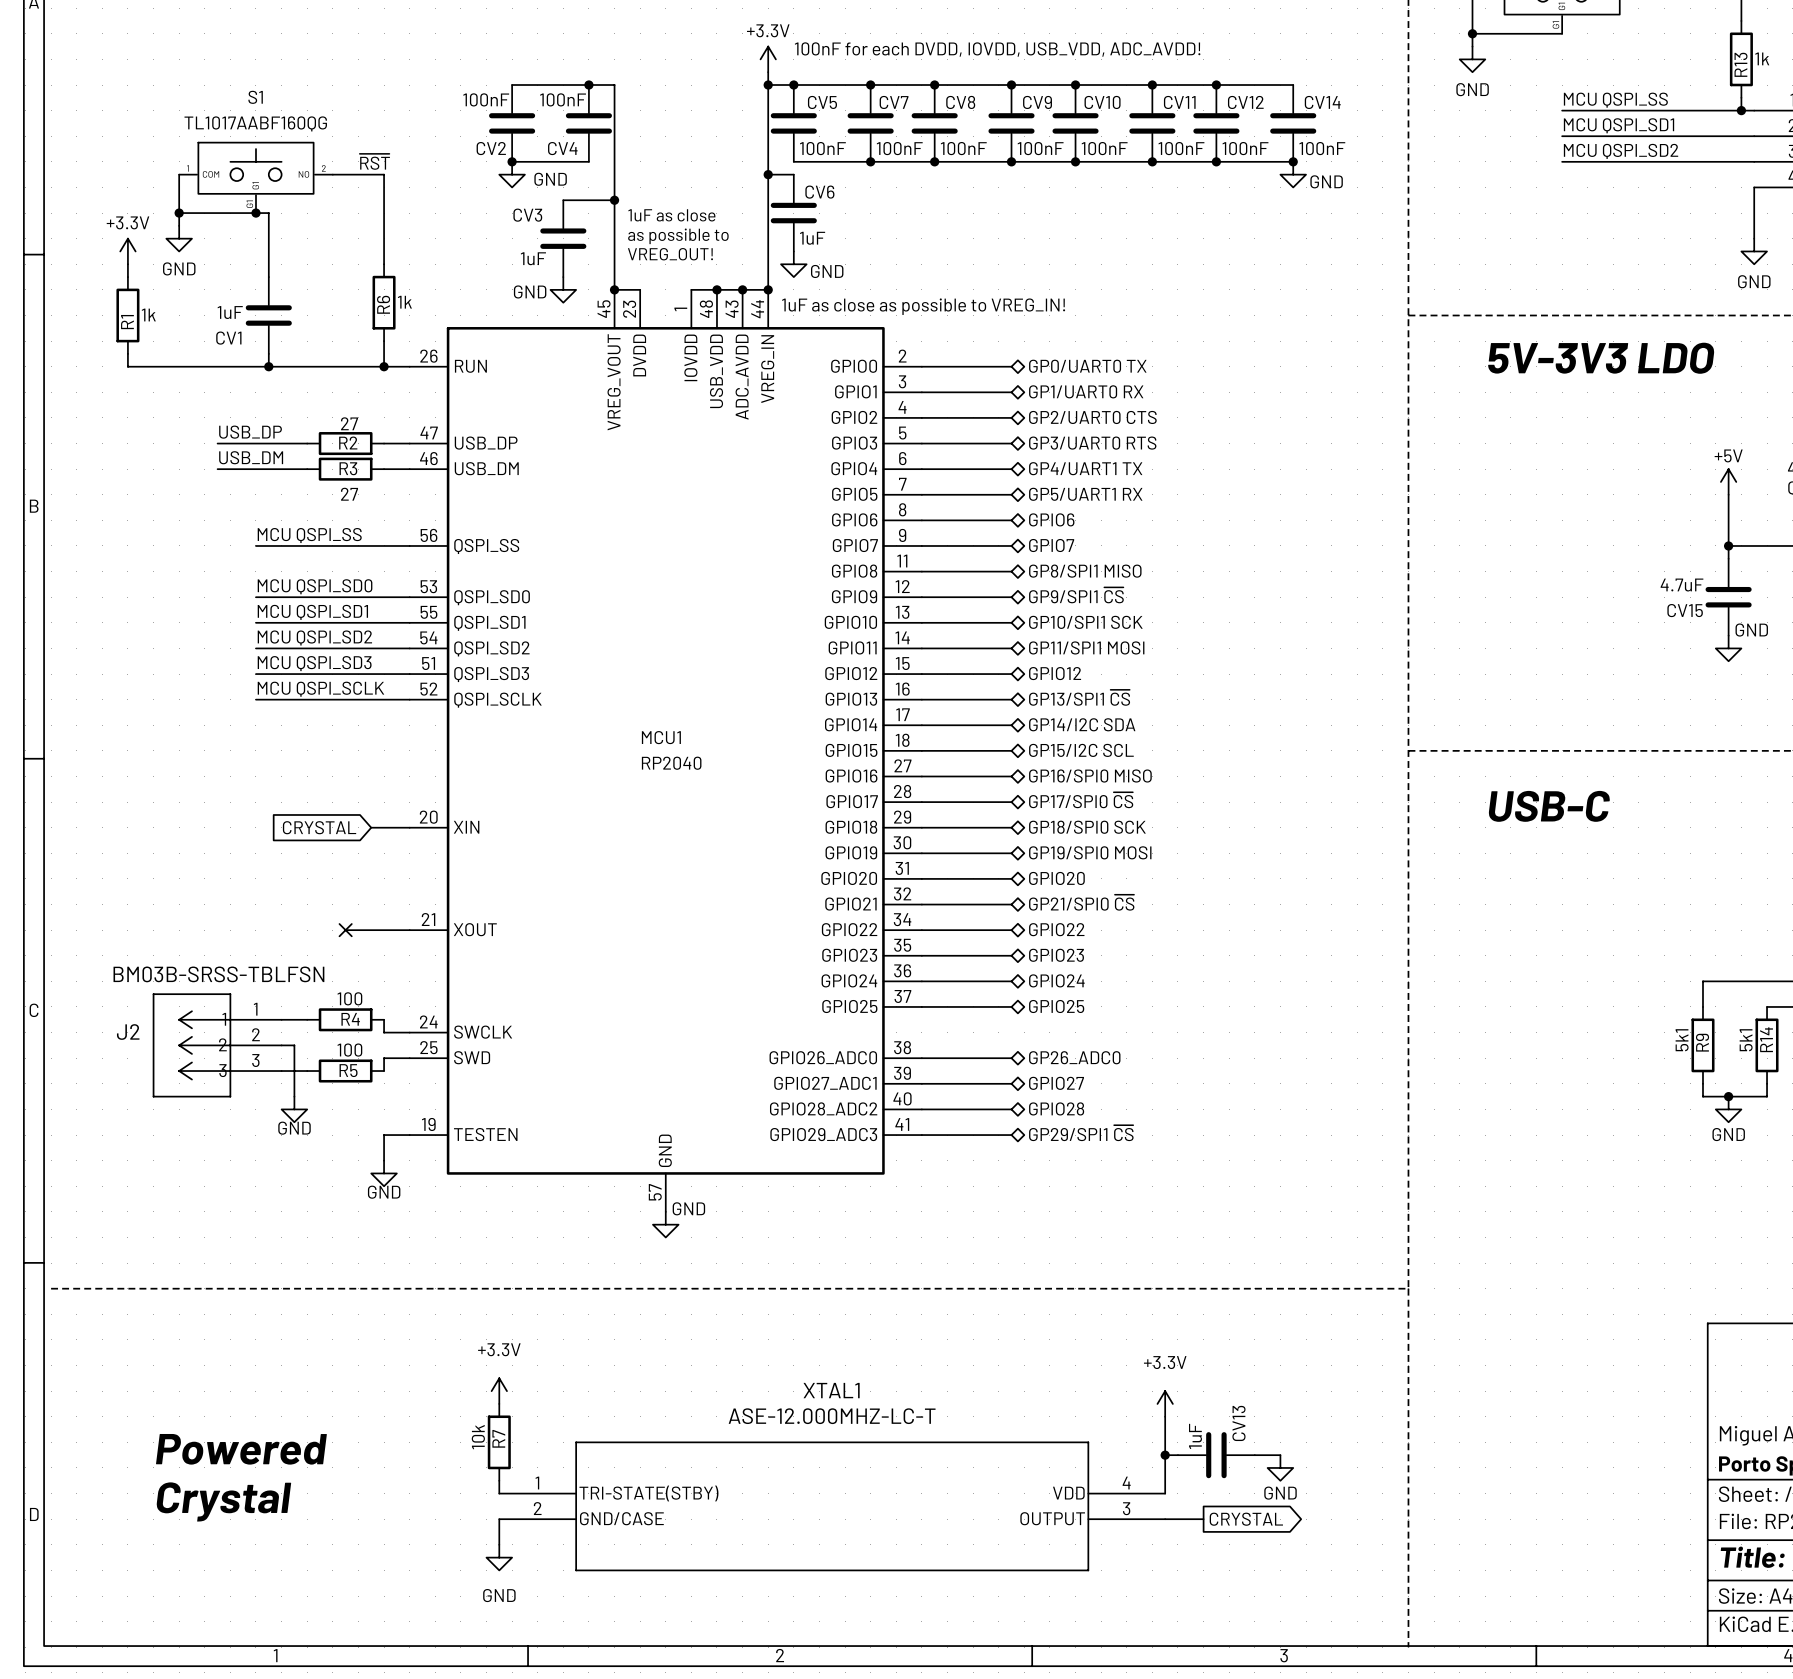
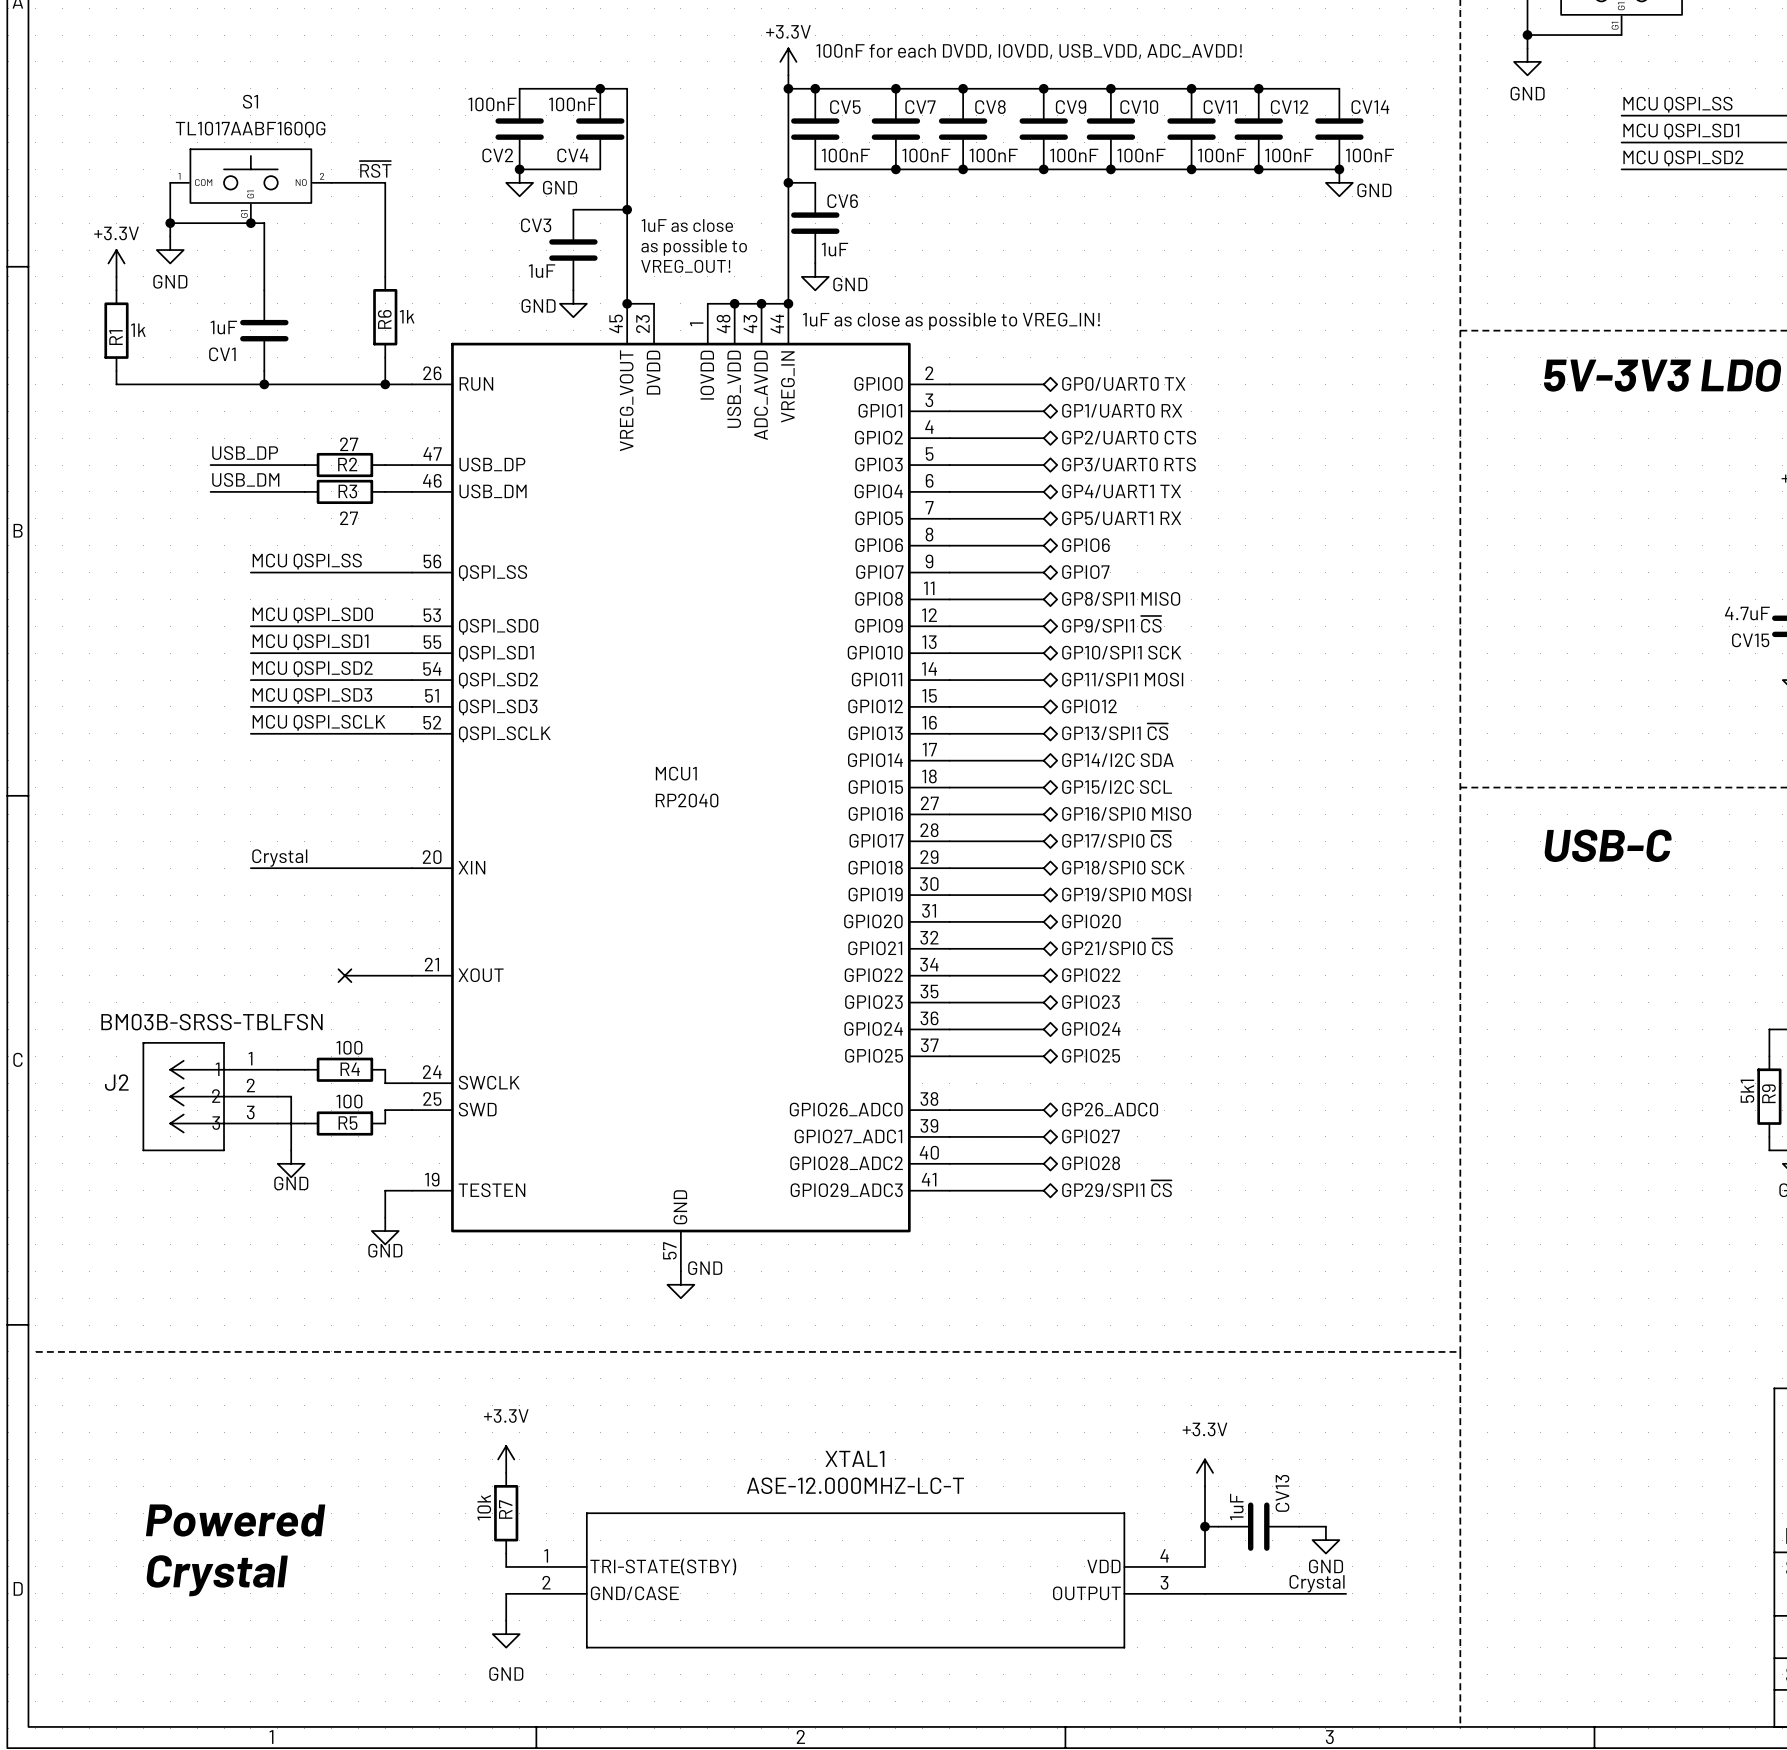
label: none -> Crystal (279, 858)
wire: none -> (250, 868) (371, 868)
global label: CRYSTAL (319, 827) -> none
label: none -> Crystal (1317, 1583)
wire: none -> (1245, 1593) (1346, 1593)
global label: CRYSTAL (1246, 1519) -> none

